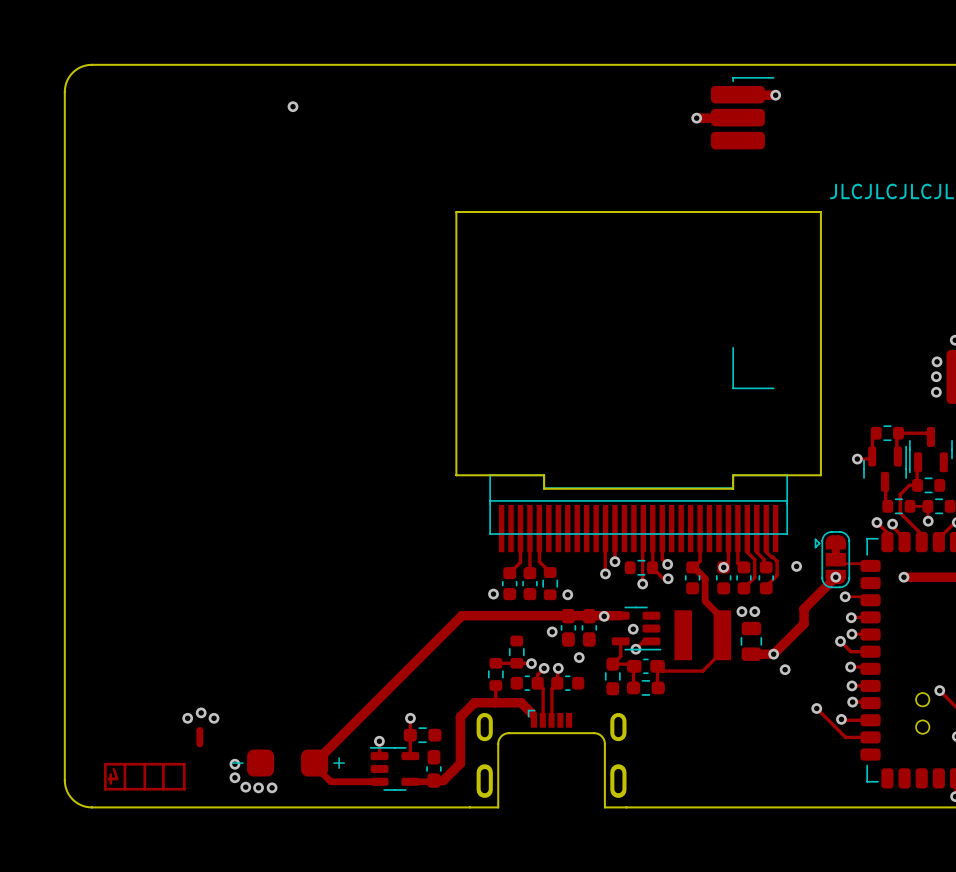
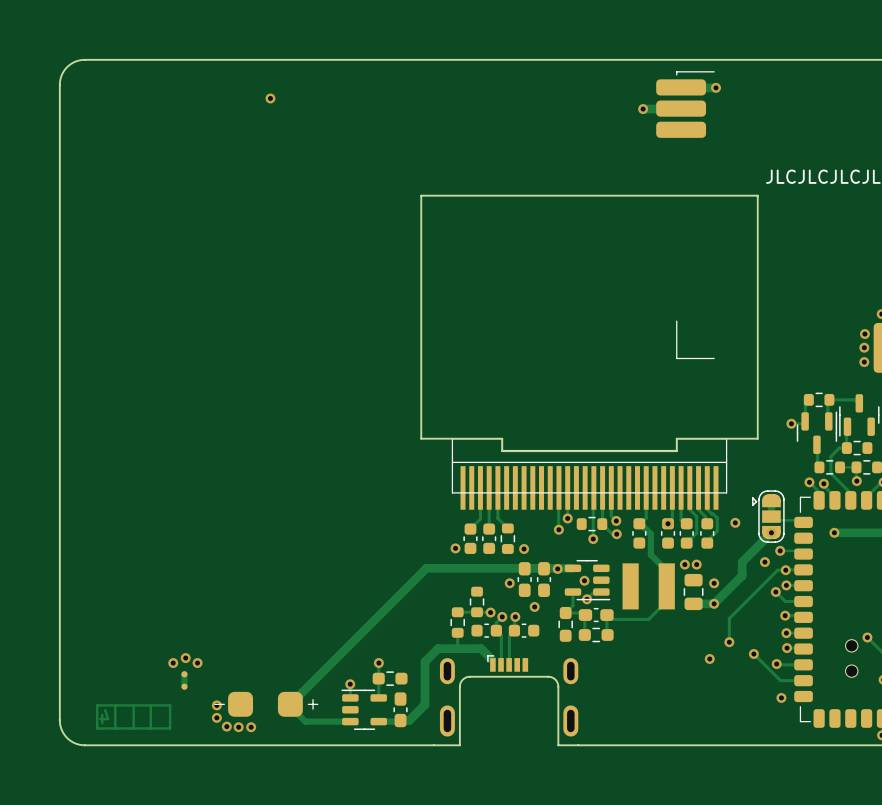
via: none -> (764, 562)
track: none -> (785, 570) (777, 570) (729, 618) (729, 642)
via: none -> (714, 583)
via: (785, 669) -> none
via: none -> (729, 642)
via: none -> (709, 658)
via: none -> (781, 697)

